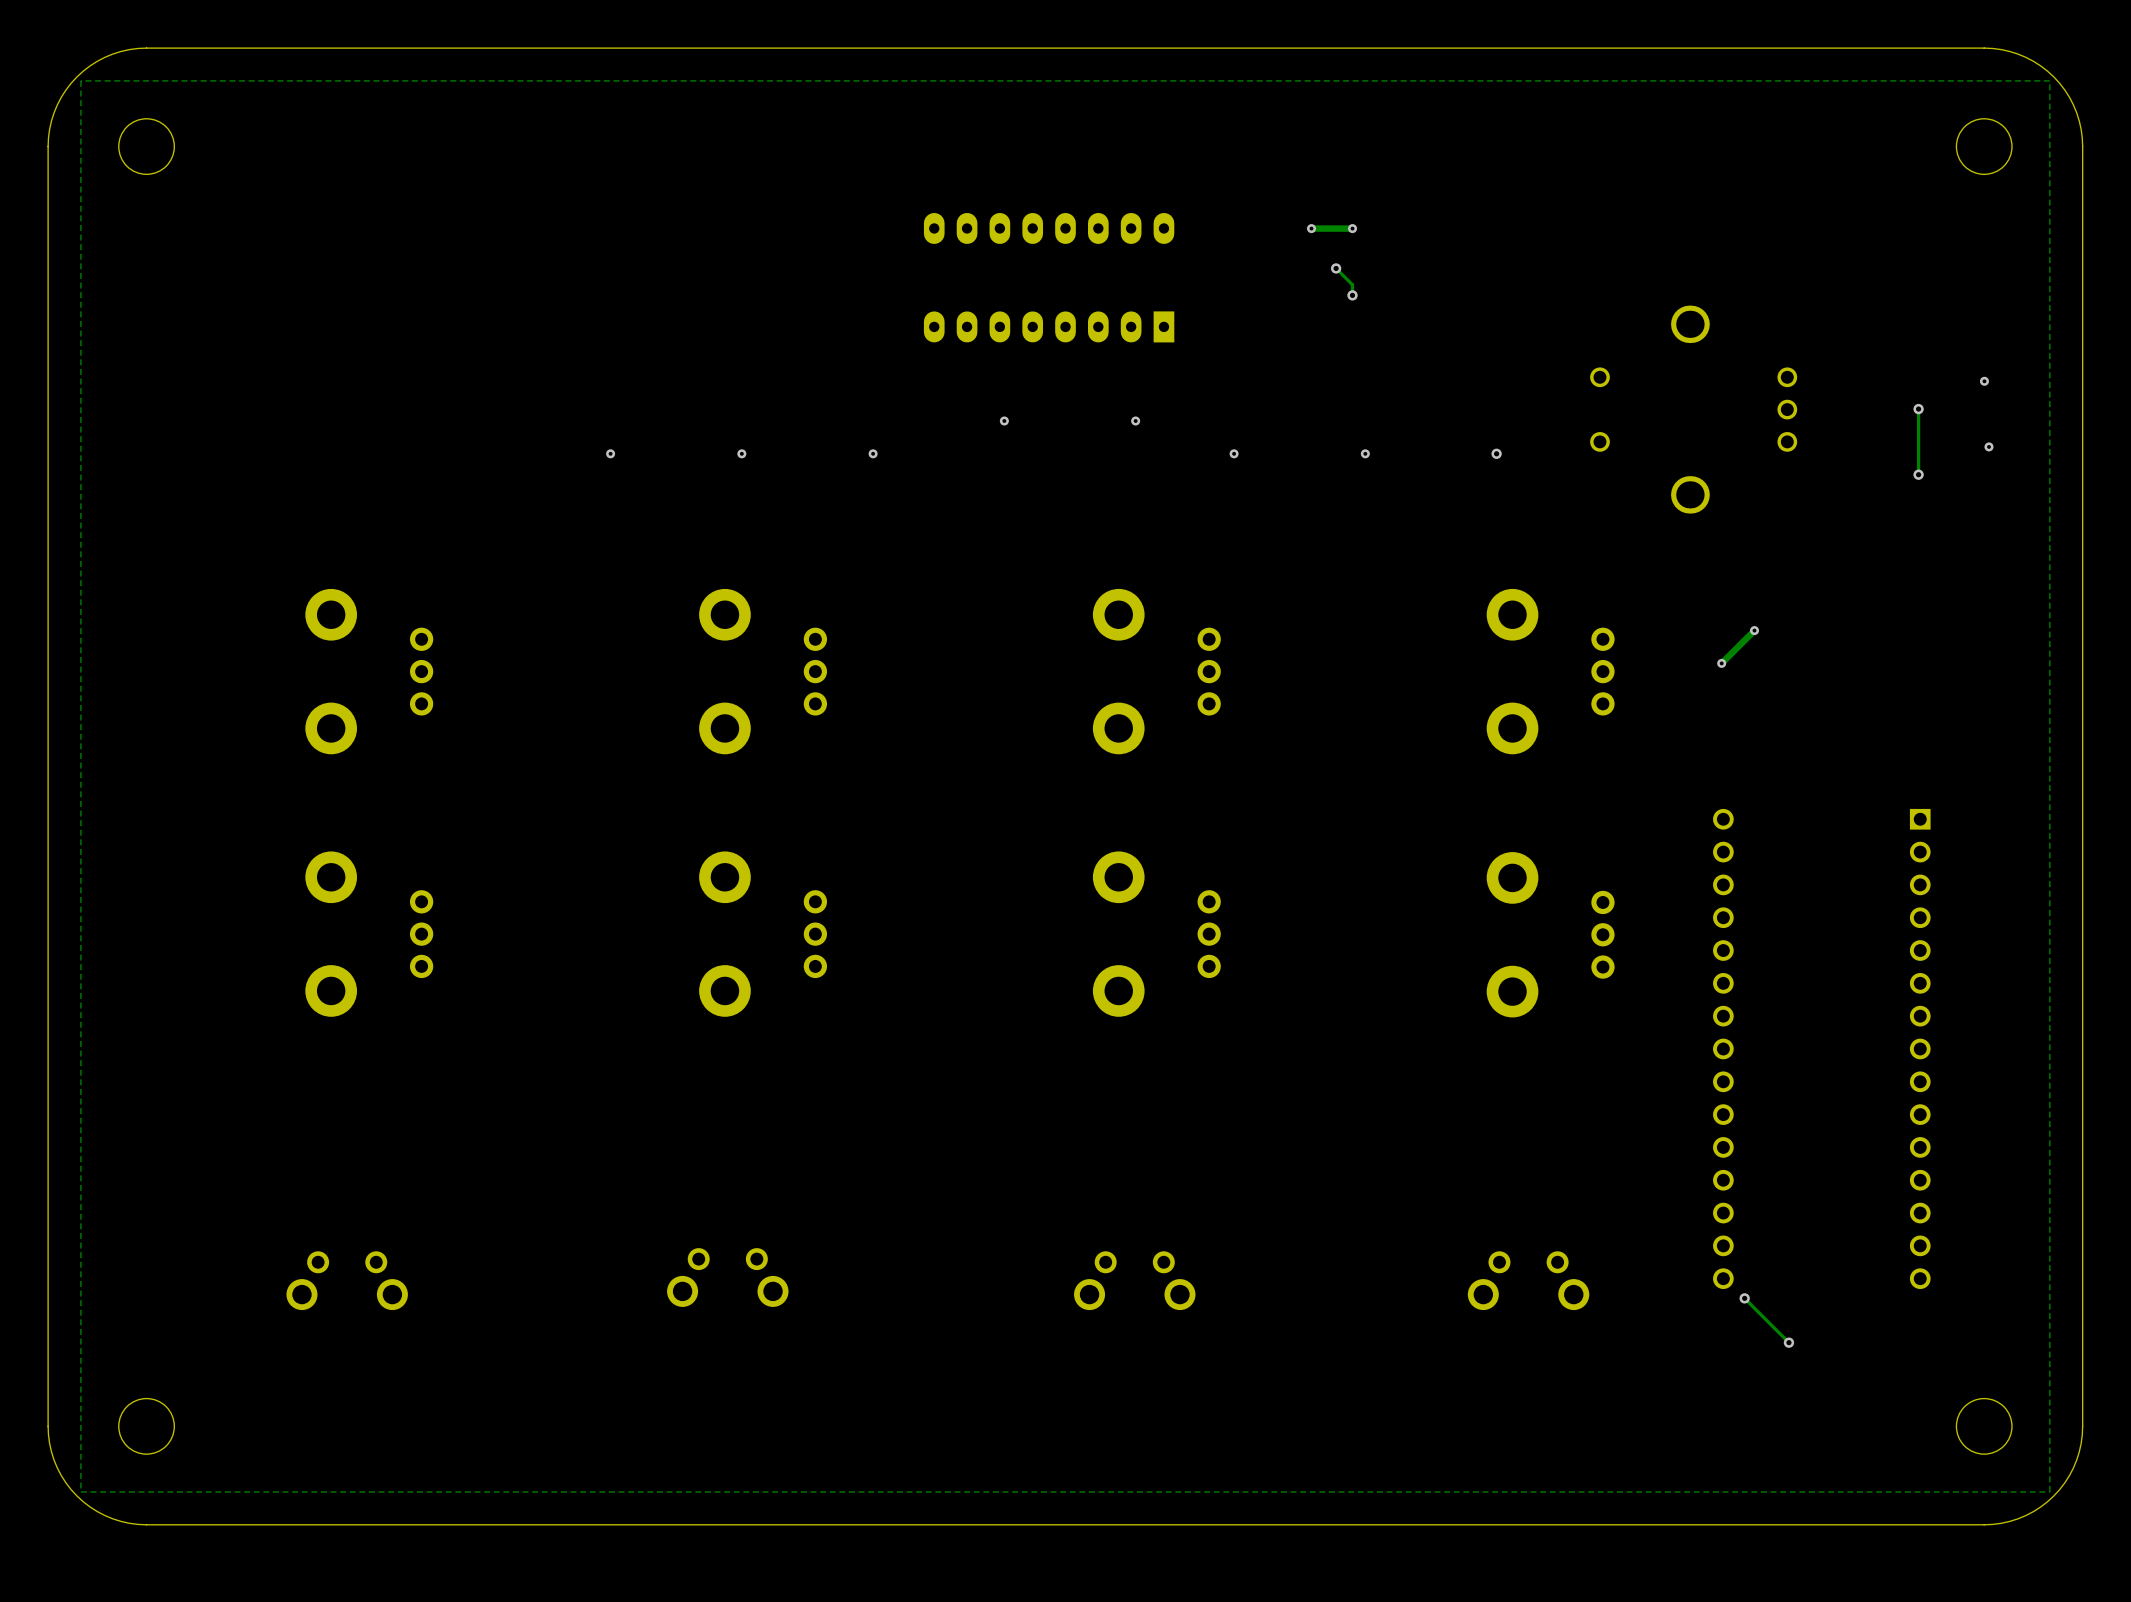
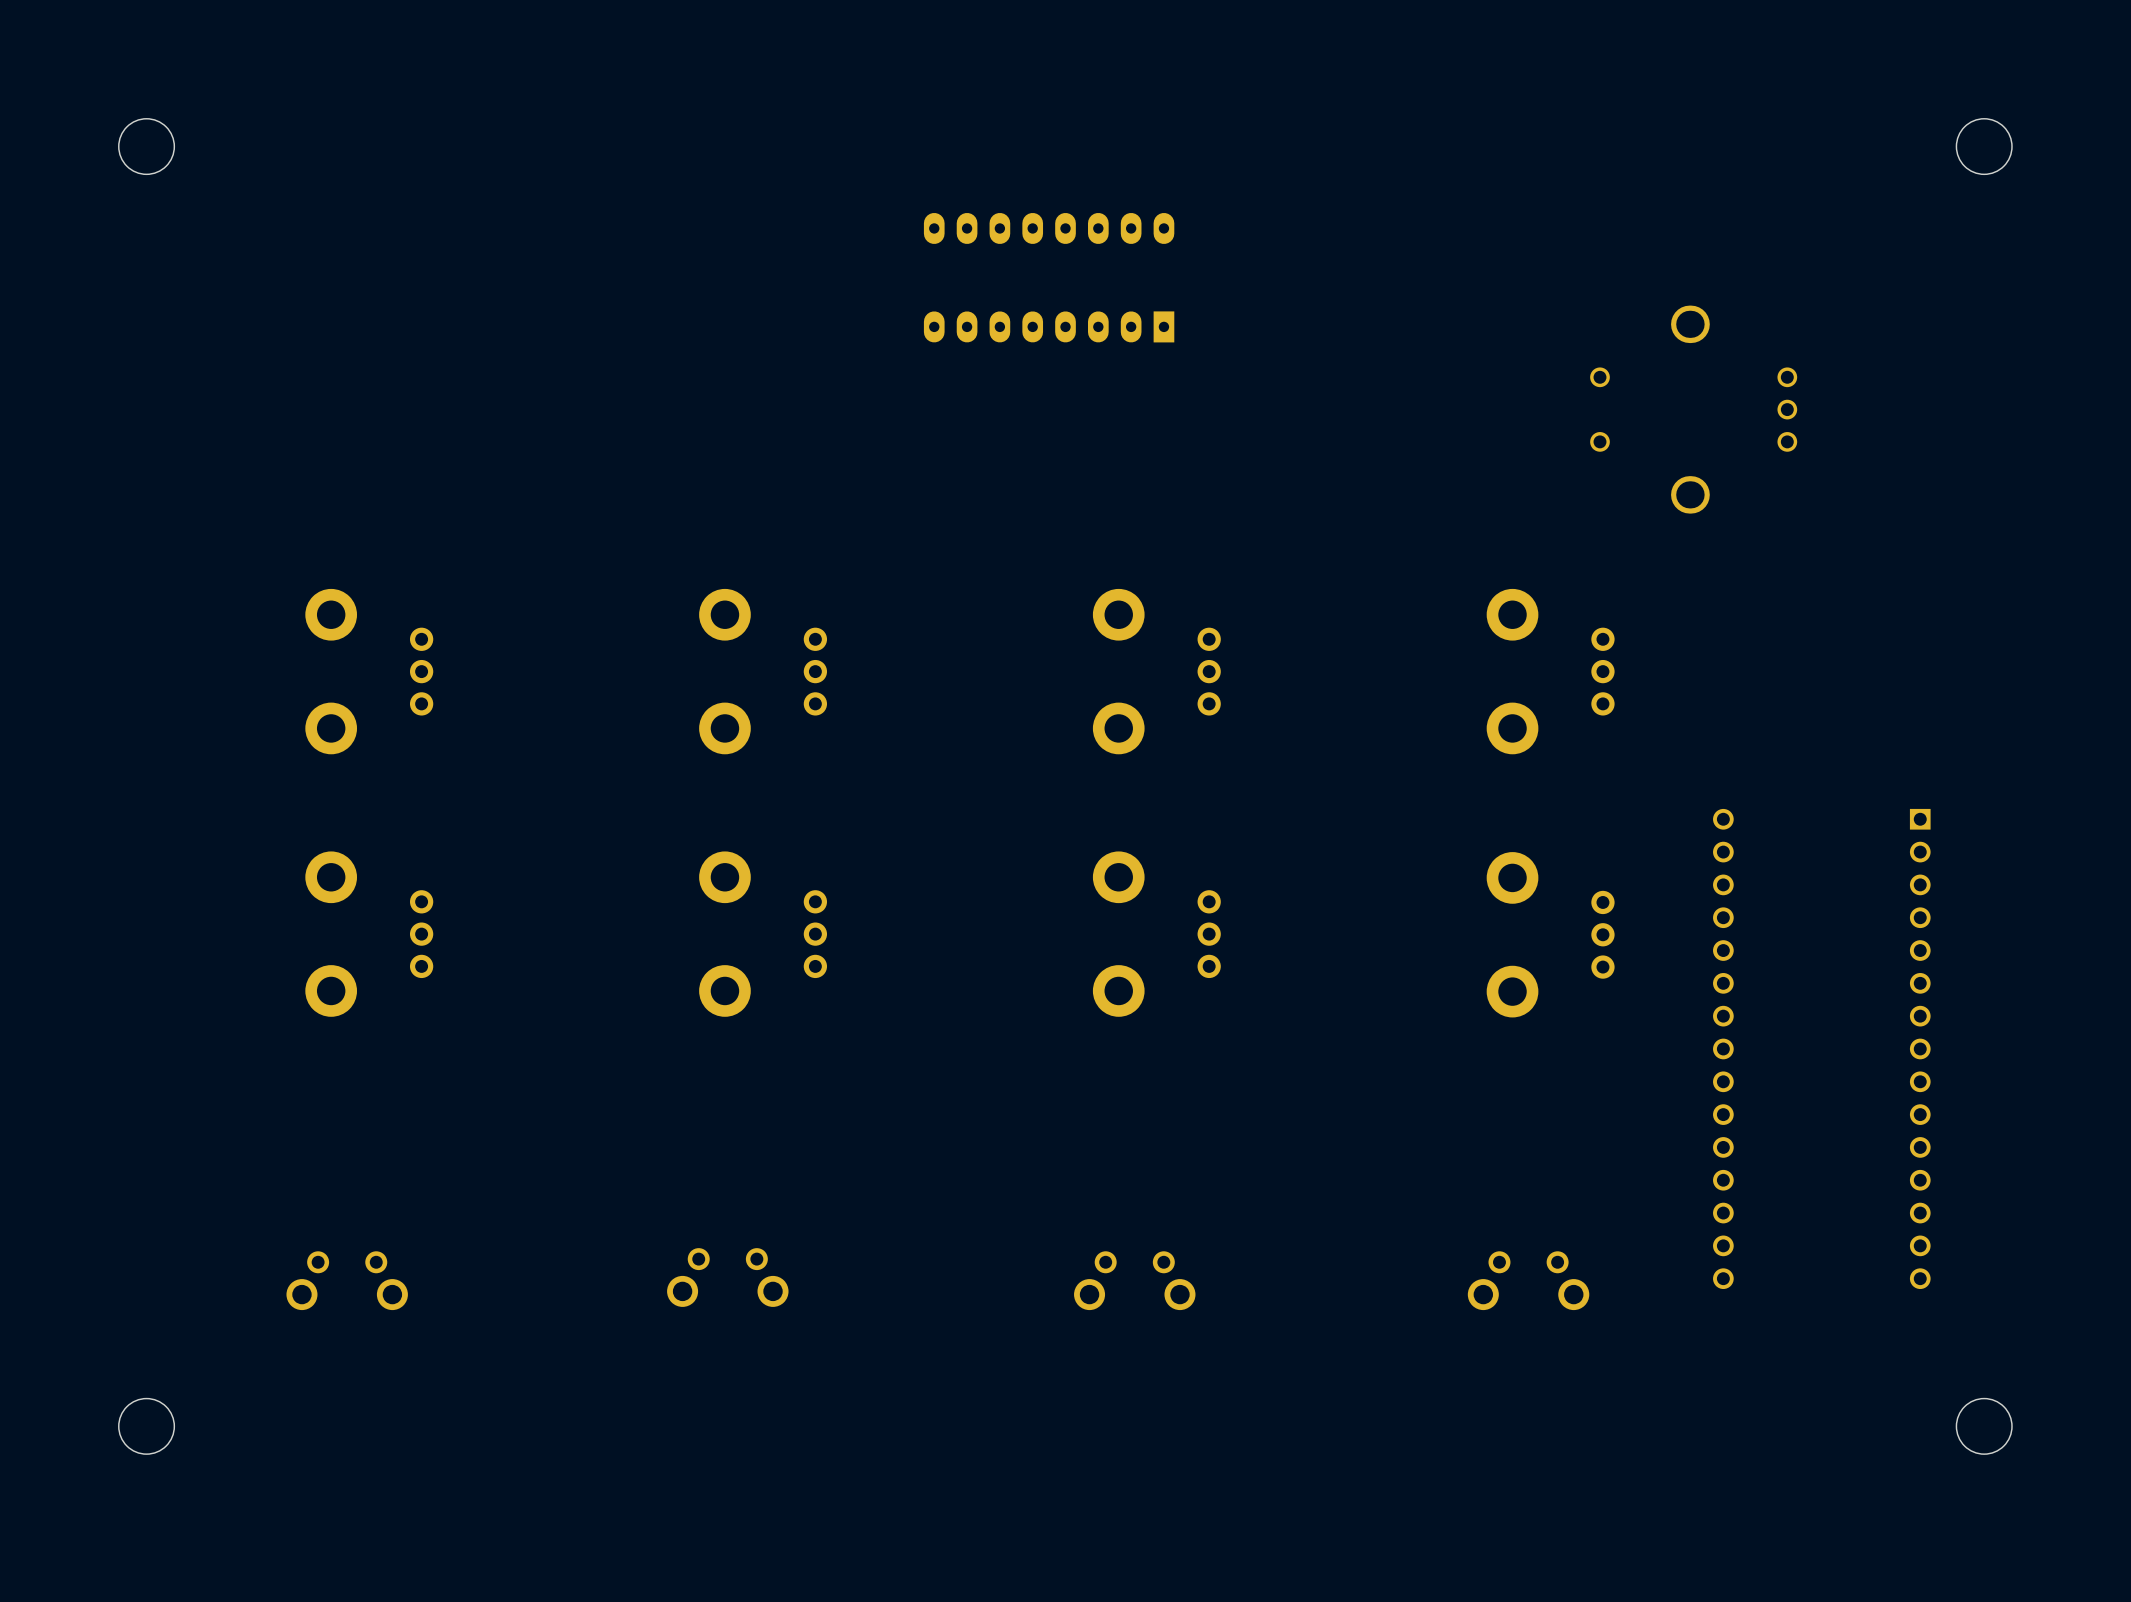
board edge: (1984, 48) (146, 48) (112, 54) (90, 65) (71, 83) (57, 104) (49, 129) (48, 146) (48, 1426) (54, 1460) (65, 1482) (83, 1501) (97, 1511) (121, 1521) (146, 1524) (1984, 1524) (2009, 1521) (2040, 1506) (2059, 1489) (2073, 1467) (2081, 1443) (2082, 1426) (2082, 146) (2076, 112) (2064, 90) (2053, 76) (2040, 65) (2017, 54) (1984, 48) -> none
zone outline: (2049, 80) (2049, 1491) (80, 1491) (80, 80) (2049, 80) -> none
via: (1311, 228) -> none
track: (1352, 228) (1311, 228) -> none
via: (1352, 228) -> none
track: (1336, 268) (1352, 284) (1352, 295) -> none
via: (1336, 268) -> none
via: (1352, 295) -> none
via: (1984, 381) -> none
track: (1918, 409) (1918, 474) -> none
via: (1918, 409) -> none
via: (1004, 420) -> none
via: (1135, 420) -> none
via: (1988, 446) -> none
via: (610, 453) -> none
via: (741, 453) -> none
via: (873, 453) -> none
via: (1234, 453) -> none
via: (1365, 453) -> none
via: (1496, 453) -> none
via: (1918, 474) -> none
track: (1754, 630) (1721, 663) -> none
via: (1754, 630) -> none
via: (1721, 663) -> none
track: (1744, 1298) (1788, 1342) -> none
via: (1744, 1298) -> none
via: (1788, 1342) -> none

